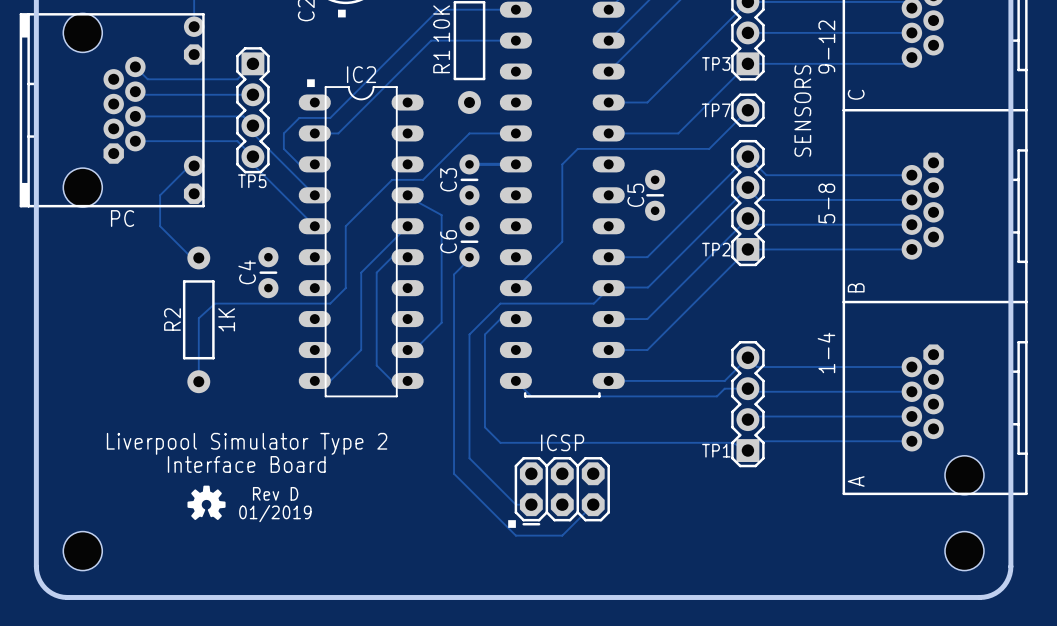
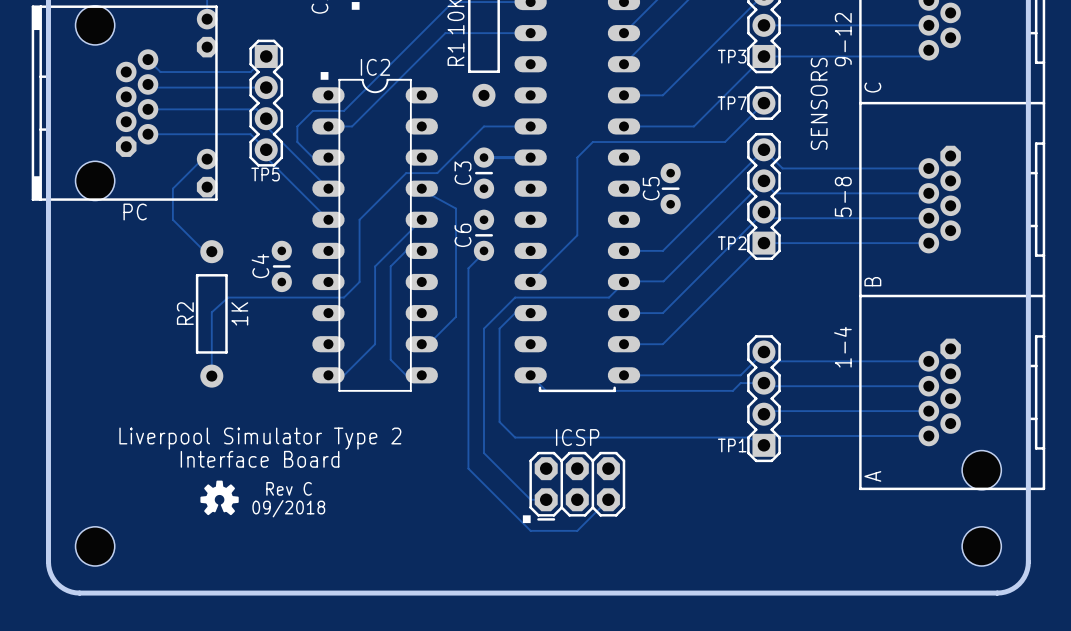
text: Rev D (275, 493) -> Rev C (289, 488)
text: 01/2019 (275, 513) -> 09/2018 (288, 508)

